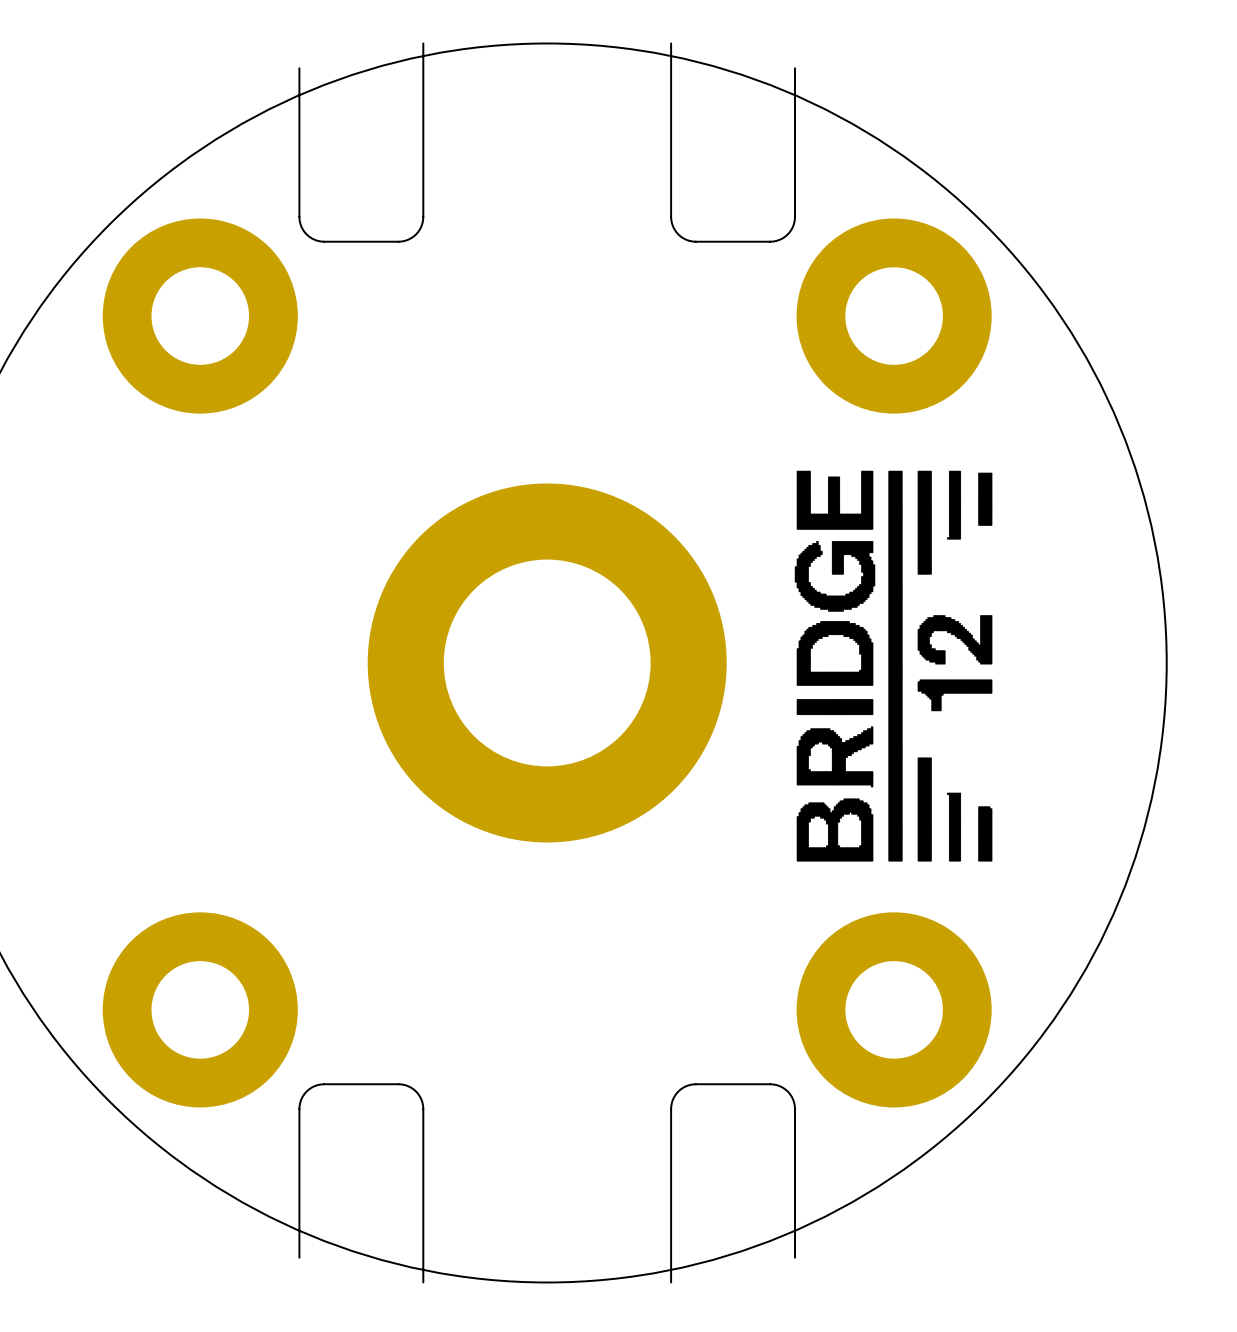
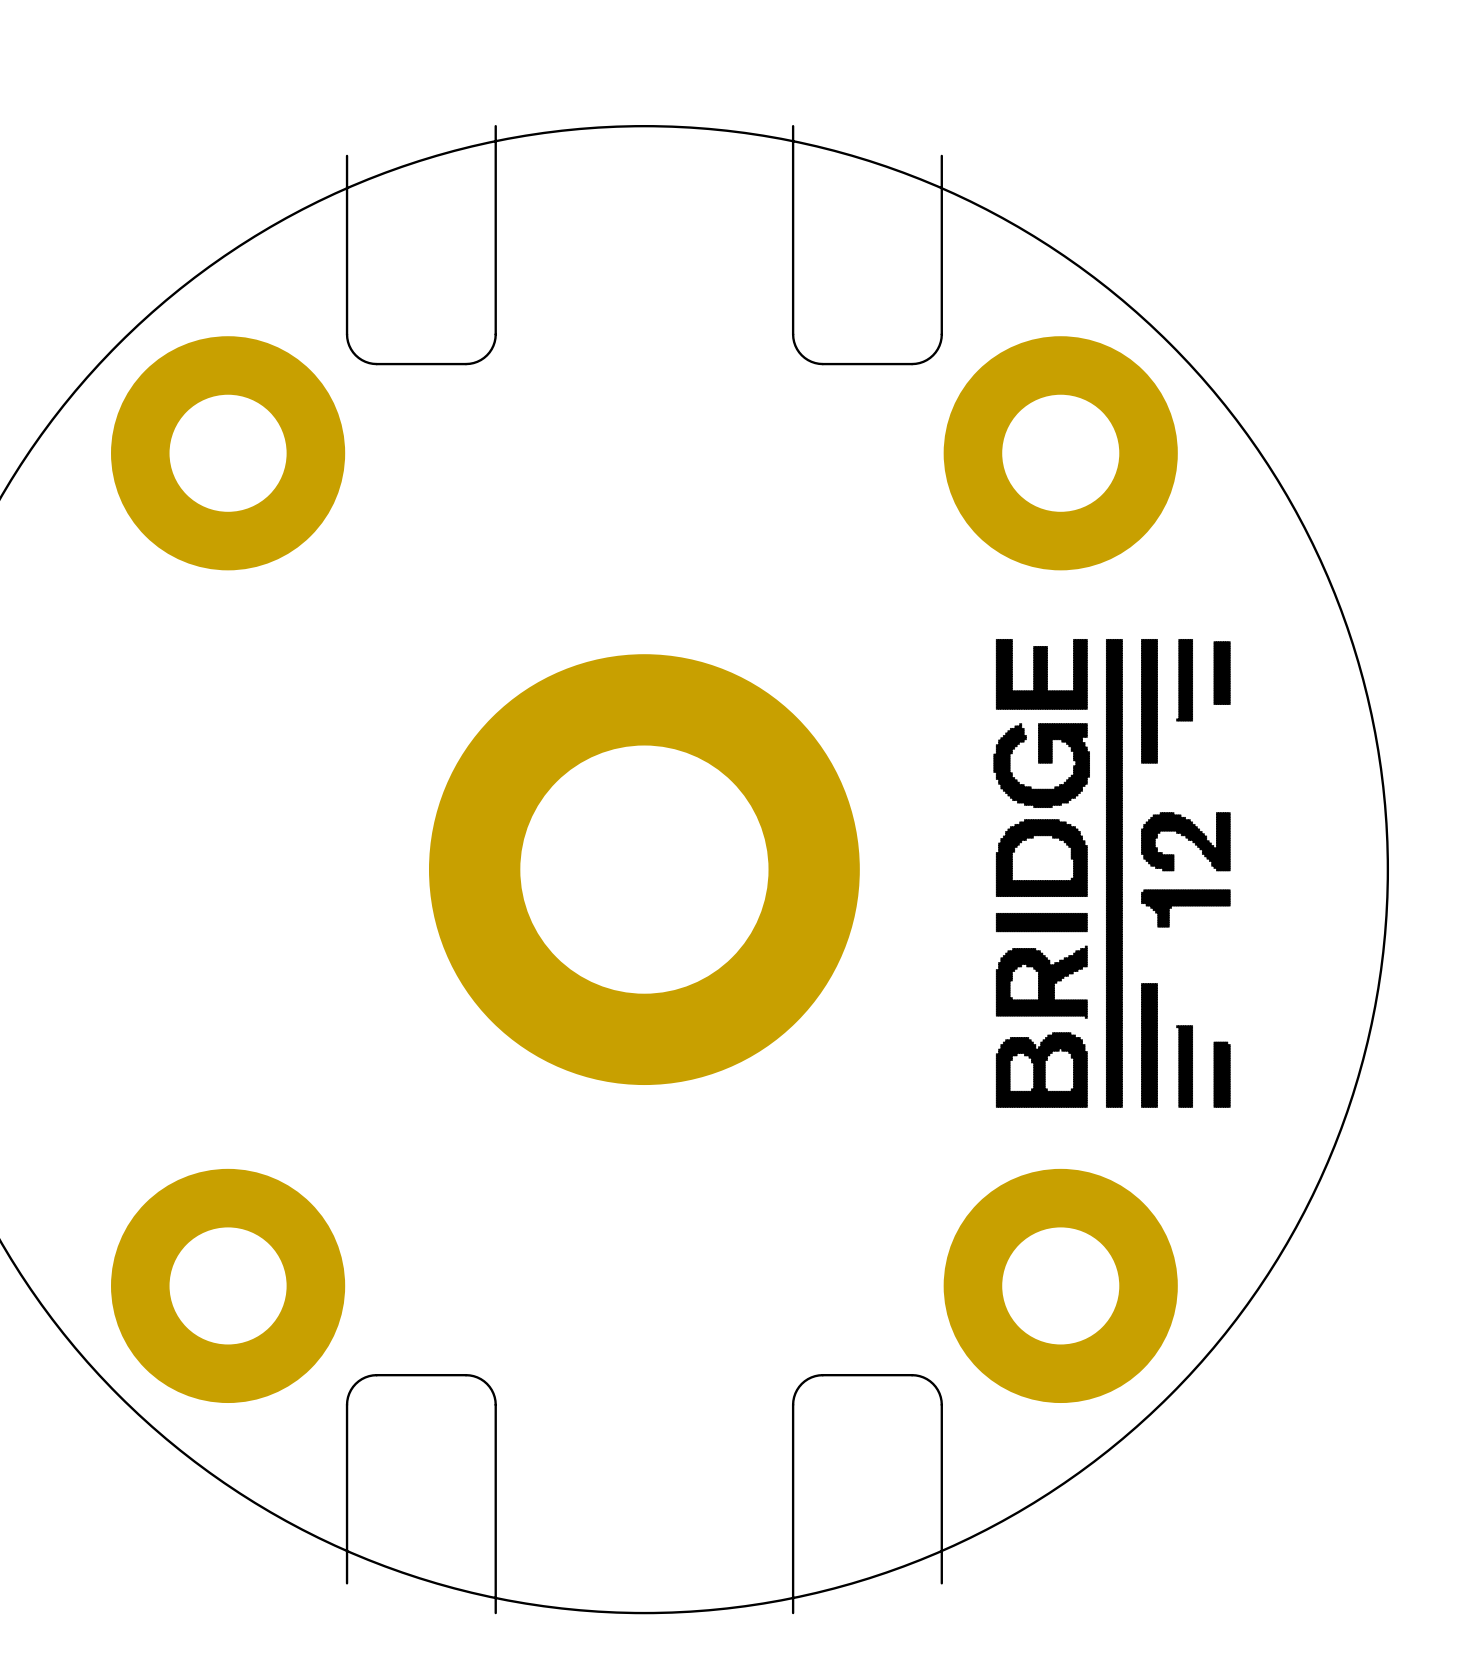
drawing position: (893, 666) -> (1112, 873)

